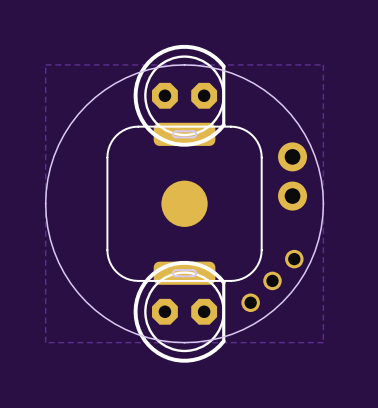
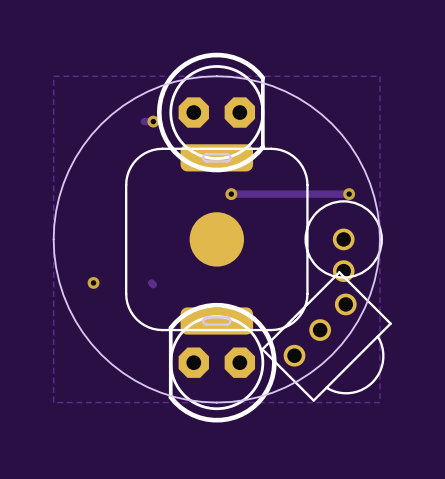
track: none -> (153, 121) (144, 121)
via: none -> (153, 121)
via: none -> (231, 194)
track: none -> (349, 194) (231, 194)
via: none -> (349, 194)
part: (292, 176) -> none
part: none -> (343, 241)
via: none -> (93, 282)
track: none -> (151, 282) (153, 284)
part side: top (272, 280) -> bottom (326, 336)
part rotation: 0° (179, 311) -> 180° (222, 362)

